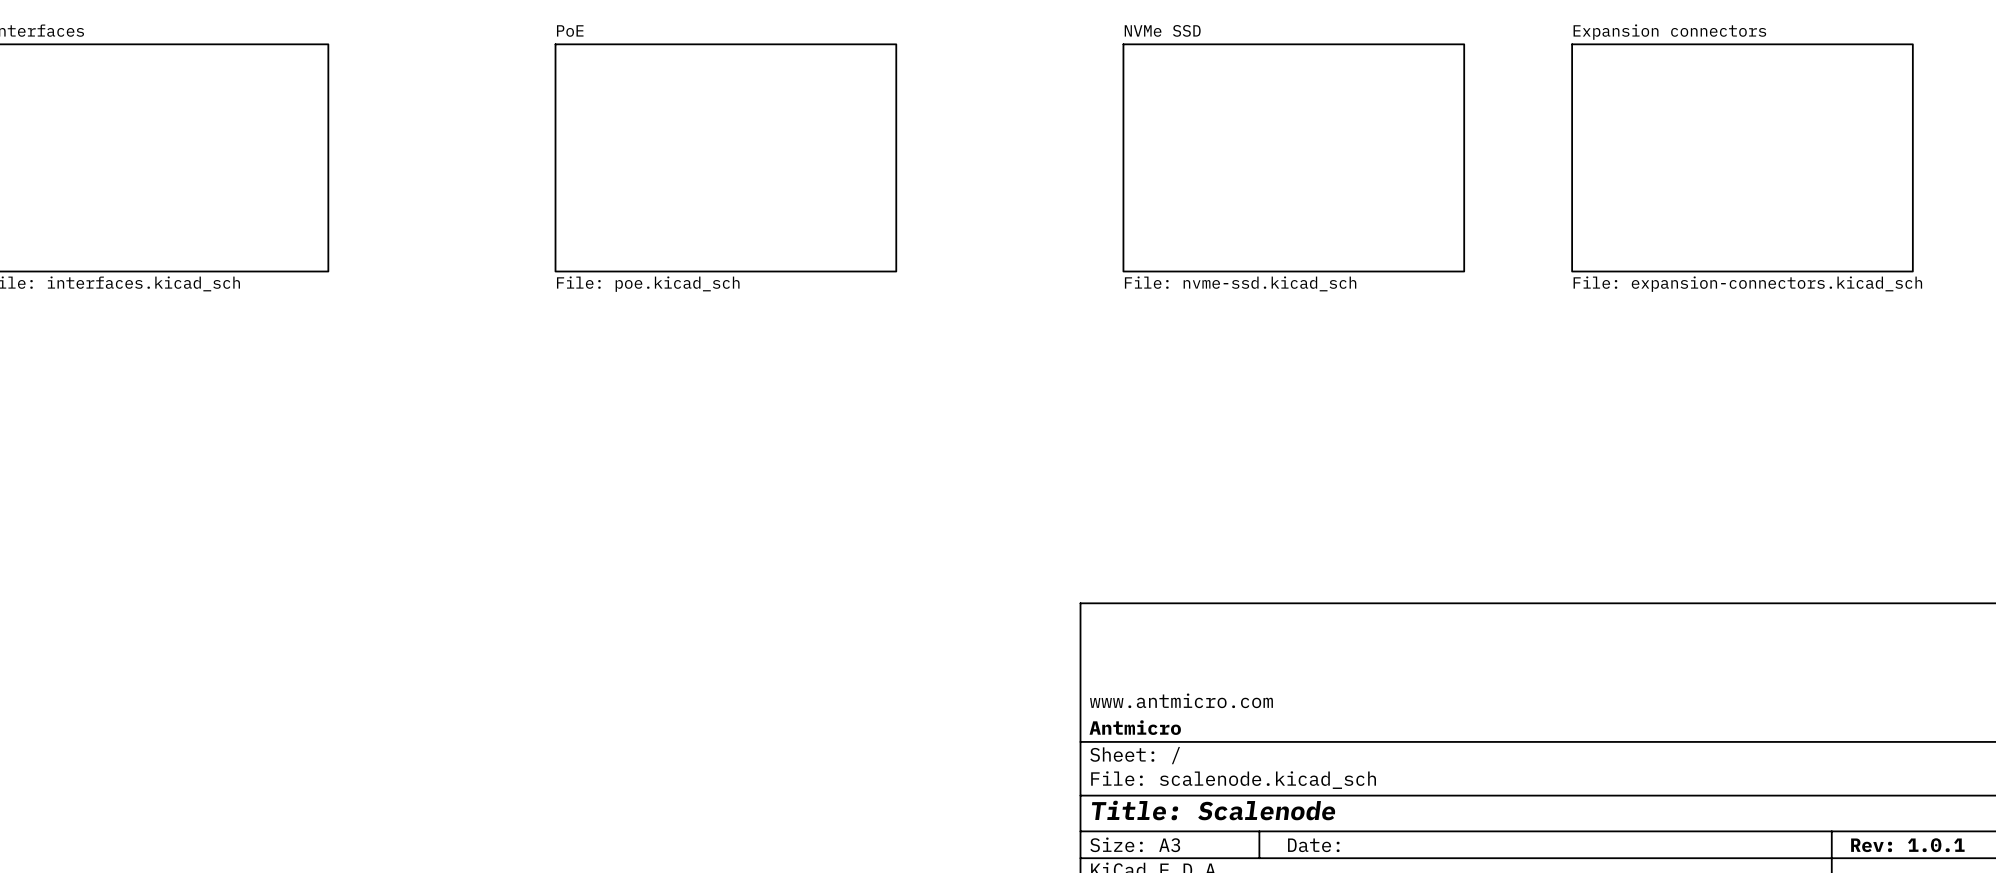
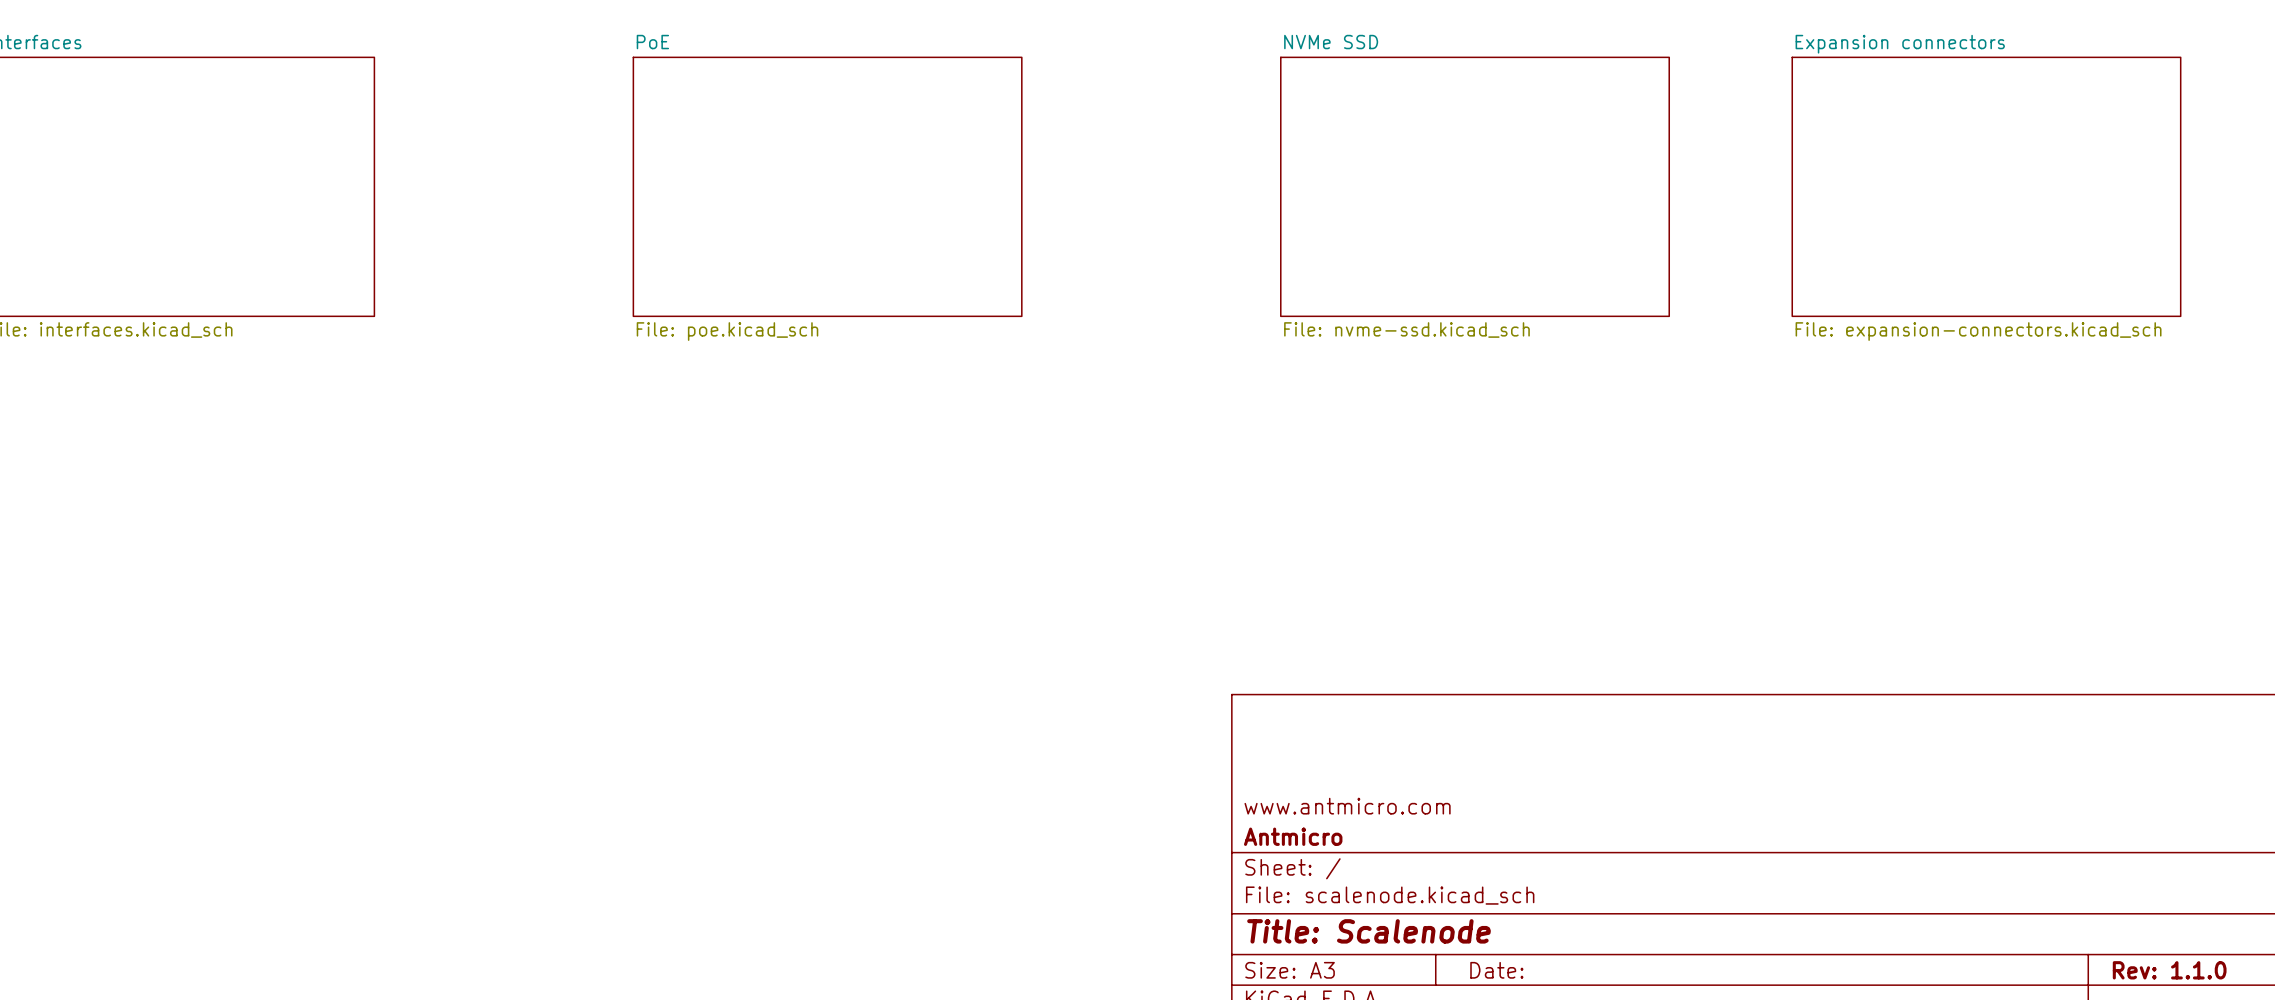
title block: Rev: 1.0.1 (1907, 845) -> Rev: 1.1.0 (2169, 970)

